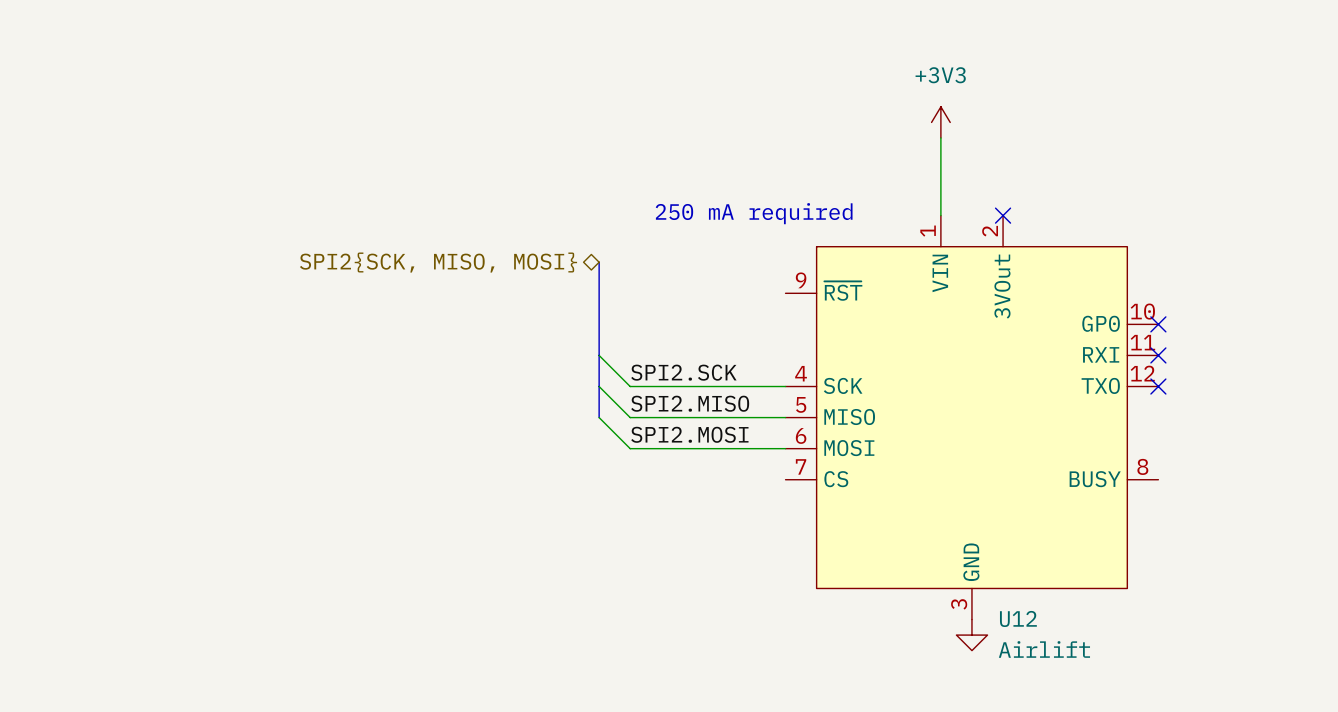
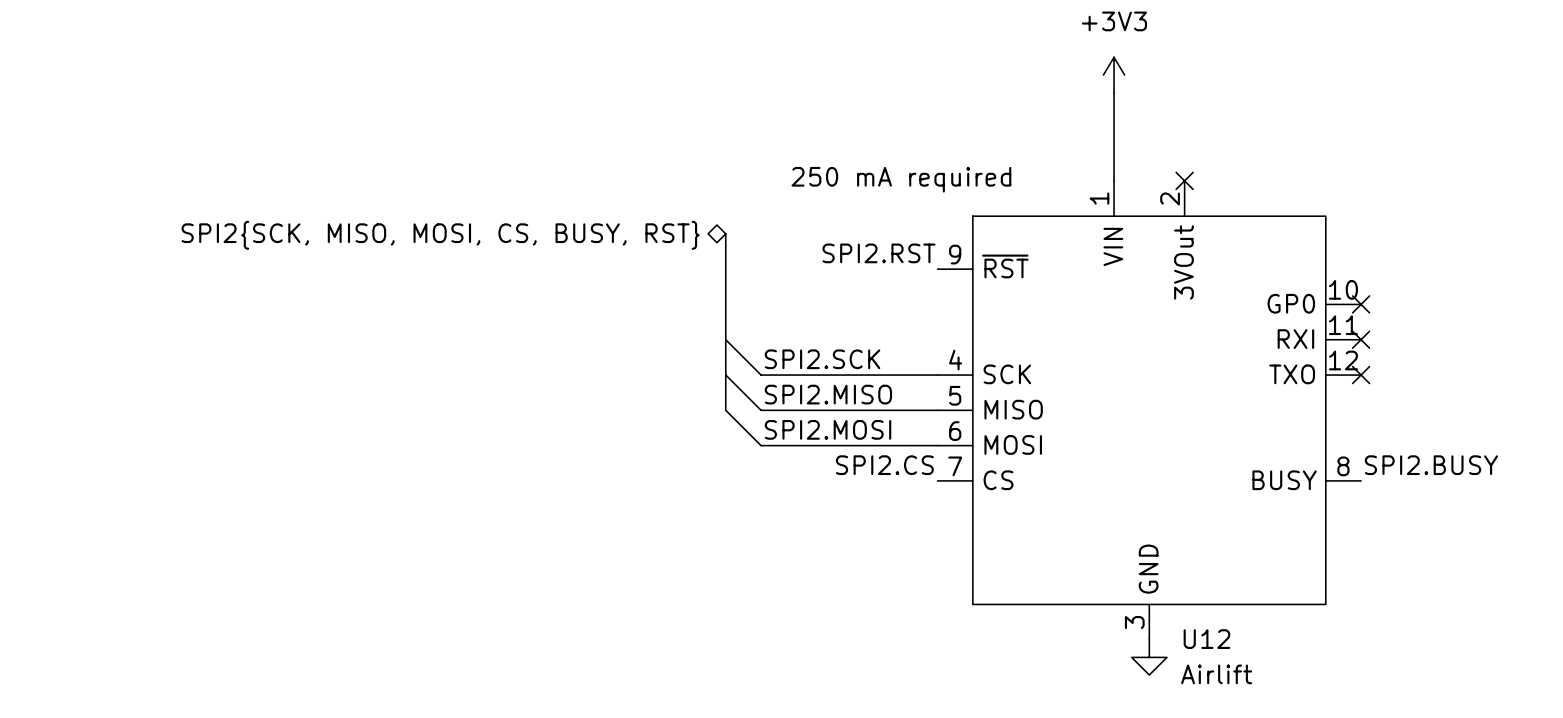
hierarchical label: SPI2{SCK, MISO, MOSI} (438, 262) -> SPI2{SCK, MISO, MOSI, CS, BUSY, RST} (440, 235)
label: none -> SPI2.RST (879, 253)
label: none -> SPI2.CS (884, 465)
label: none -> SPI2.BUSY (1431, 465)

